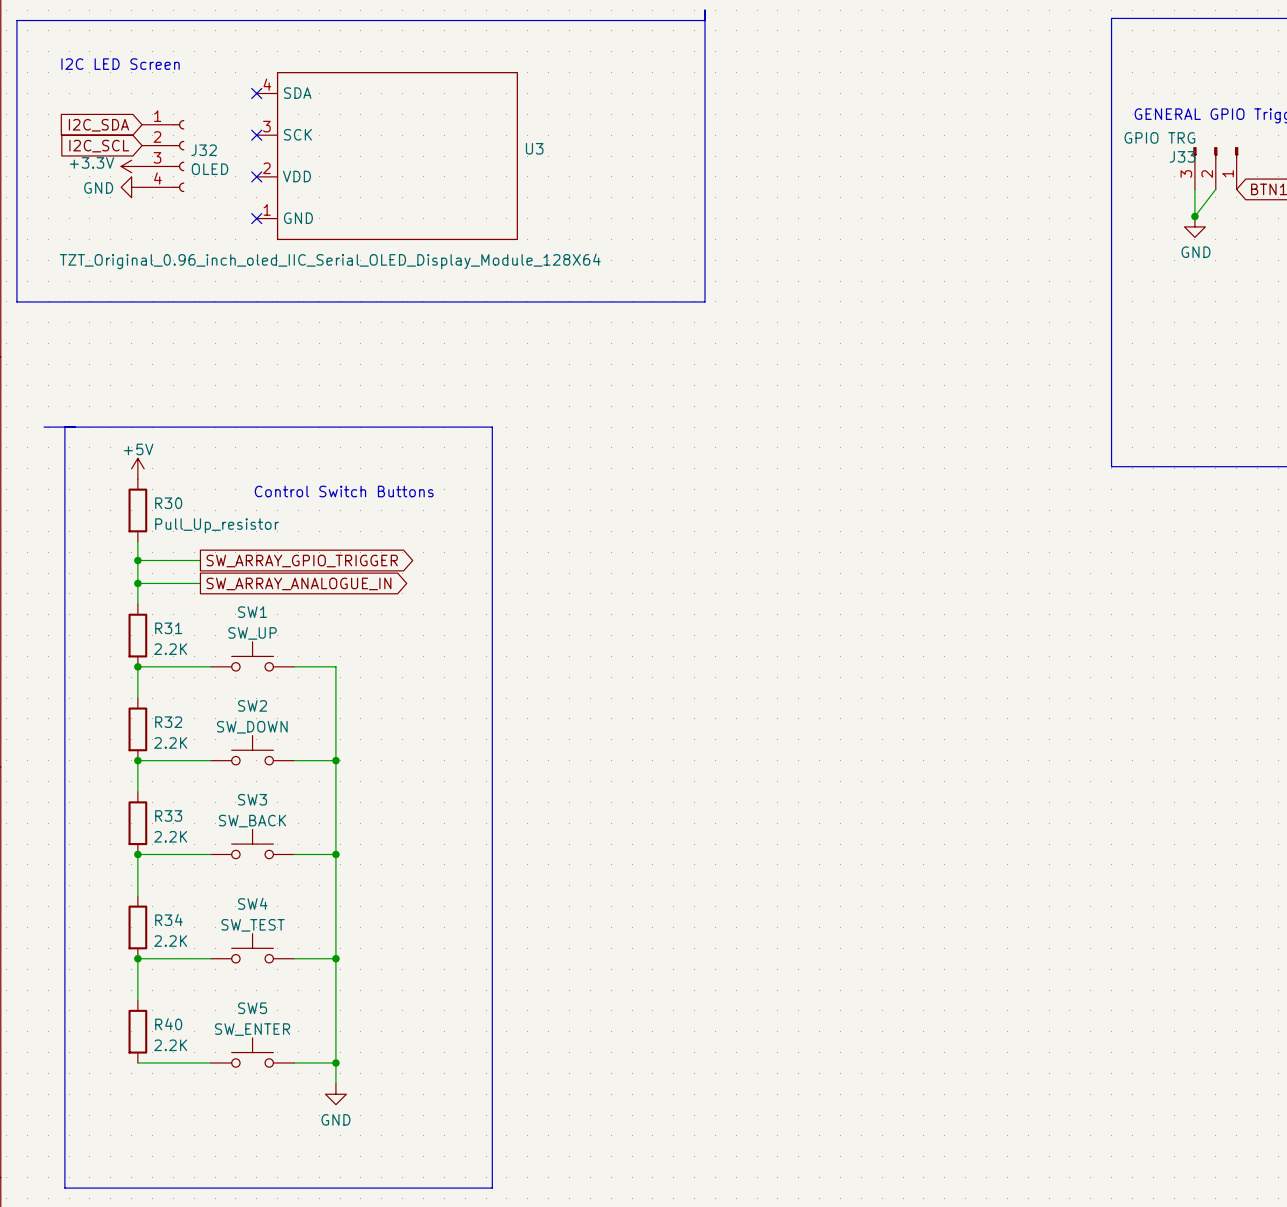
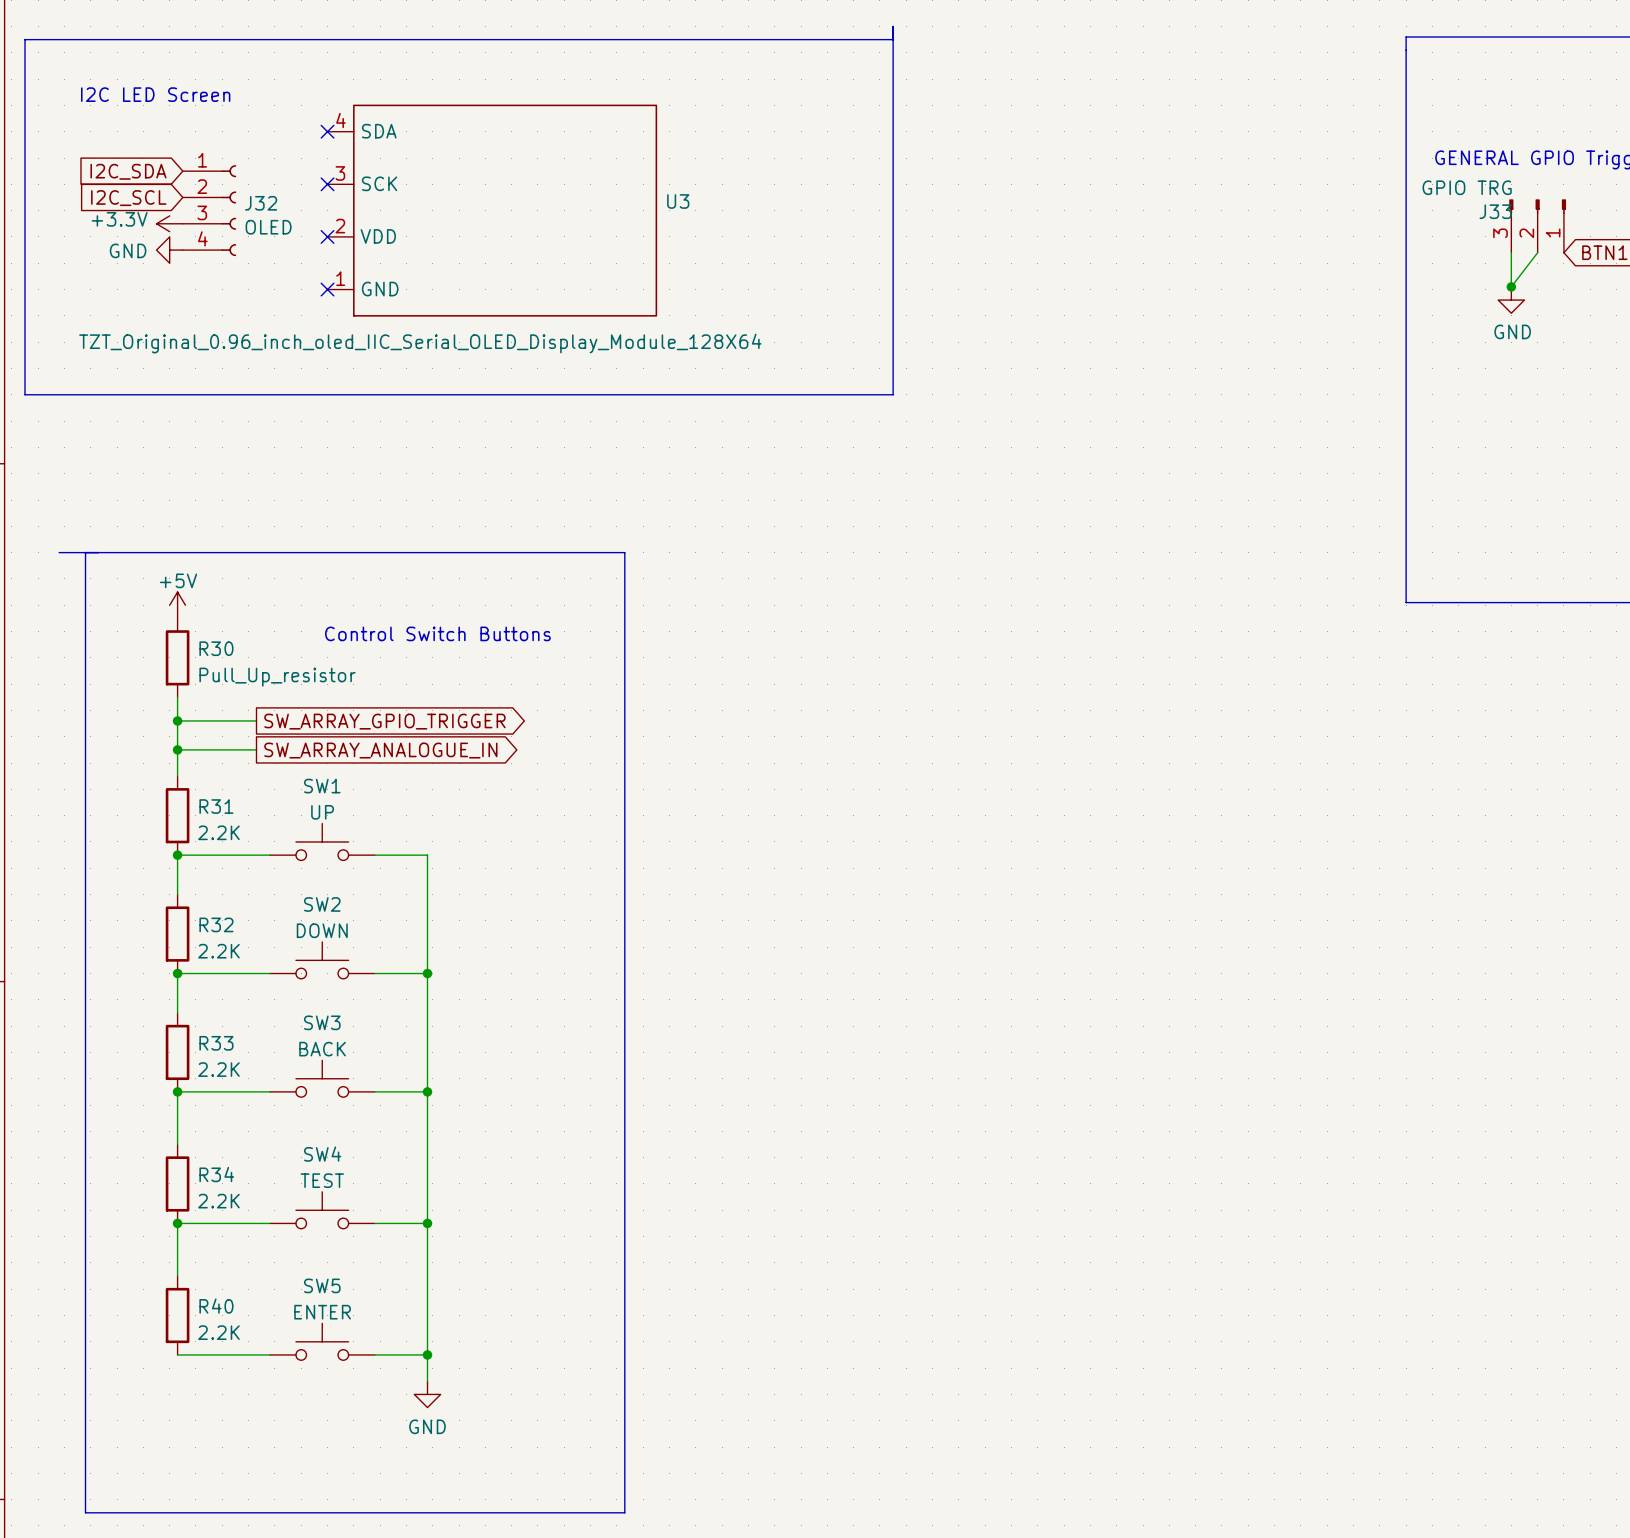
SW1 value: SW_UP (252, 633) -> UP (322, 812)
SW2 value: SW_DOWN (252, 727) -> DOWN (322, 930)
SW3 value: SW_BACK (252, 821) -> BACK (322, 1049)
SW4 value: SW_TEST (253, 925) -> TEST (322, 1180)
SW5 value: SW_ENTER (252, 1029) -> ENTER (322, 1312)

